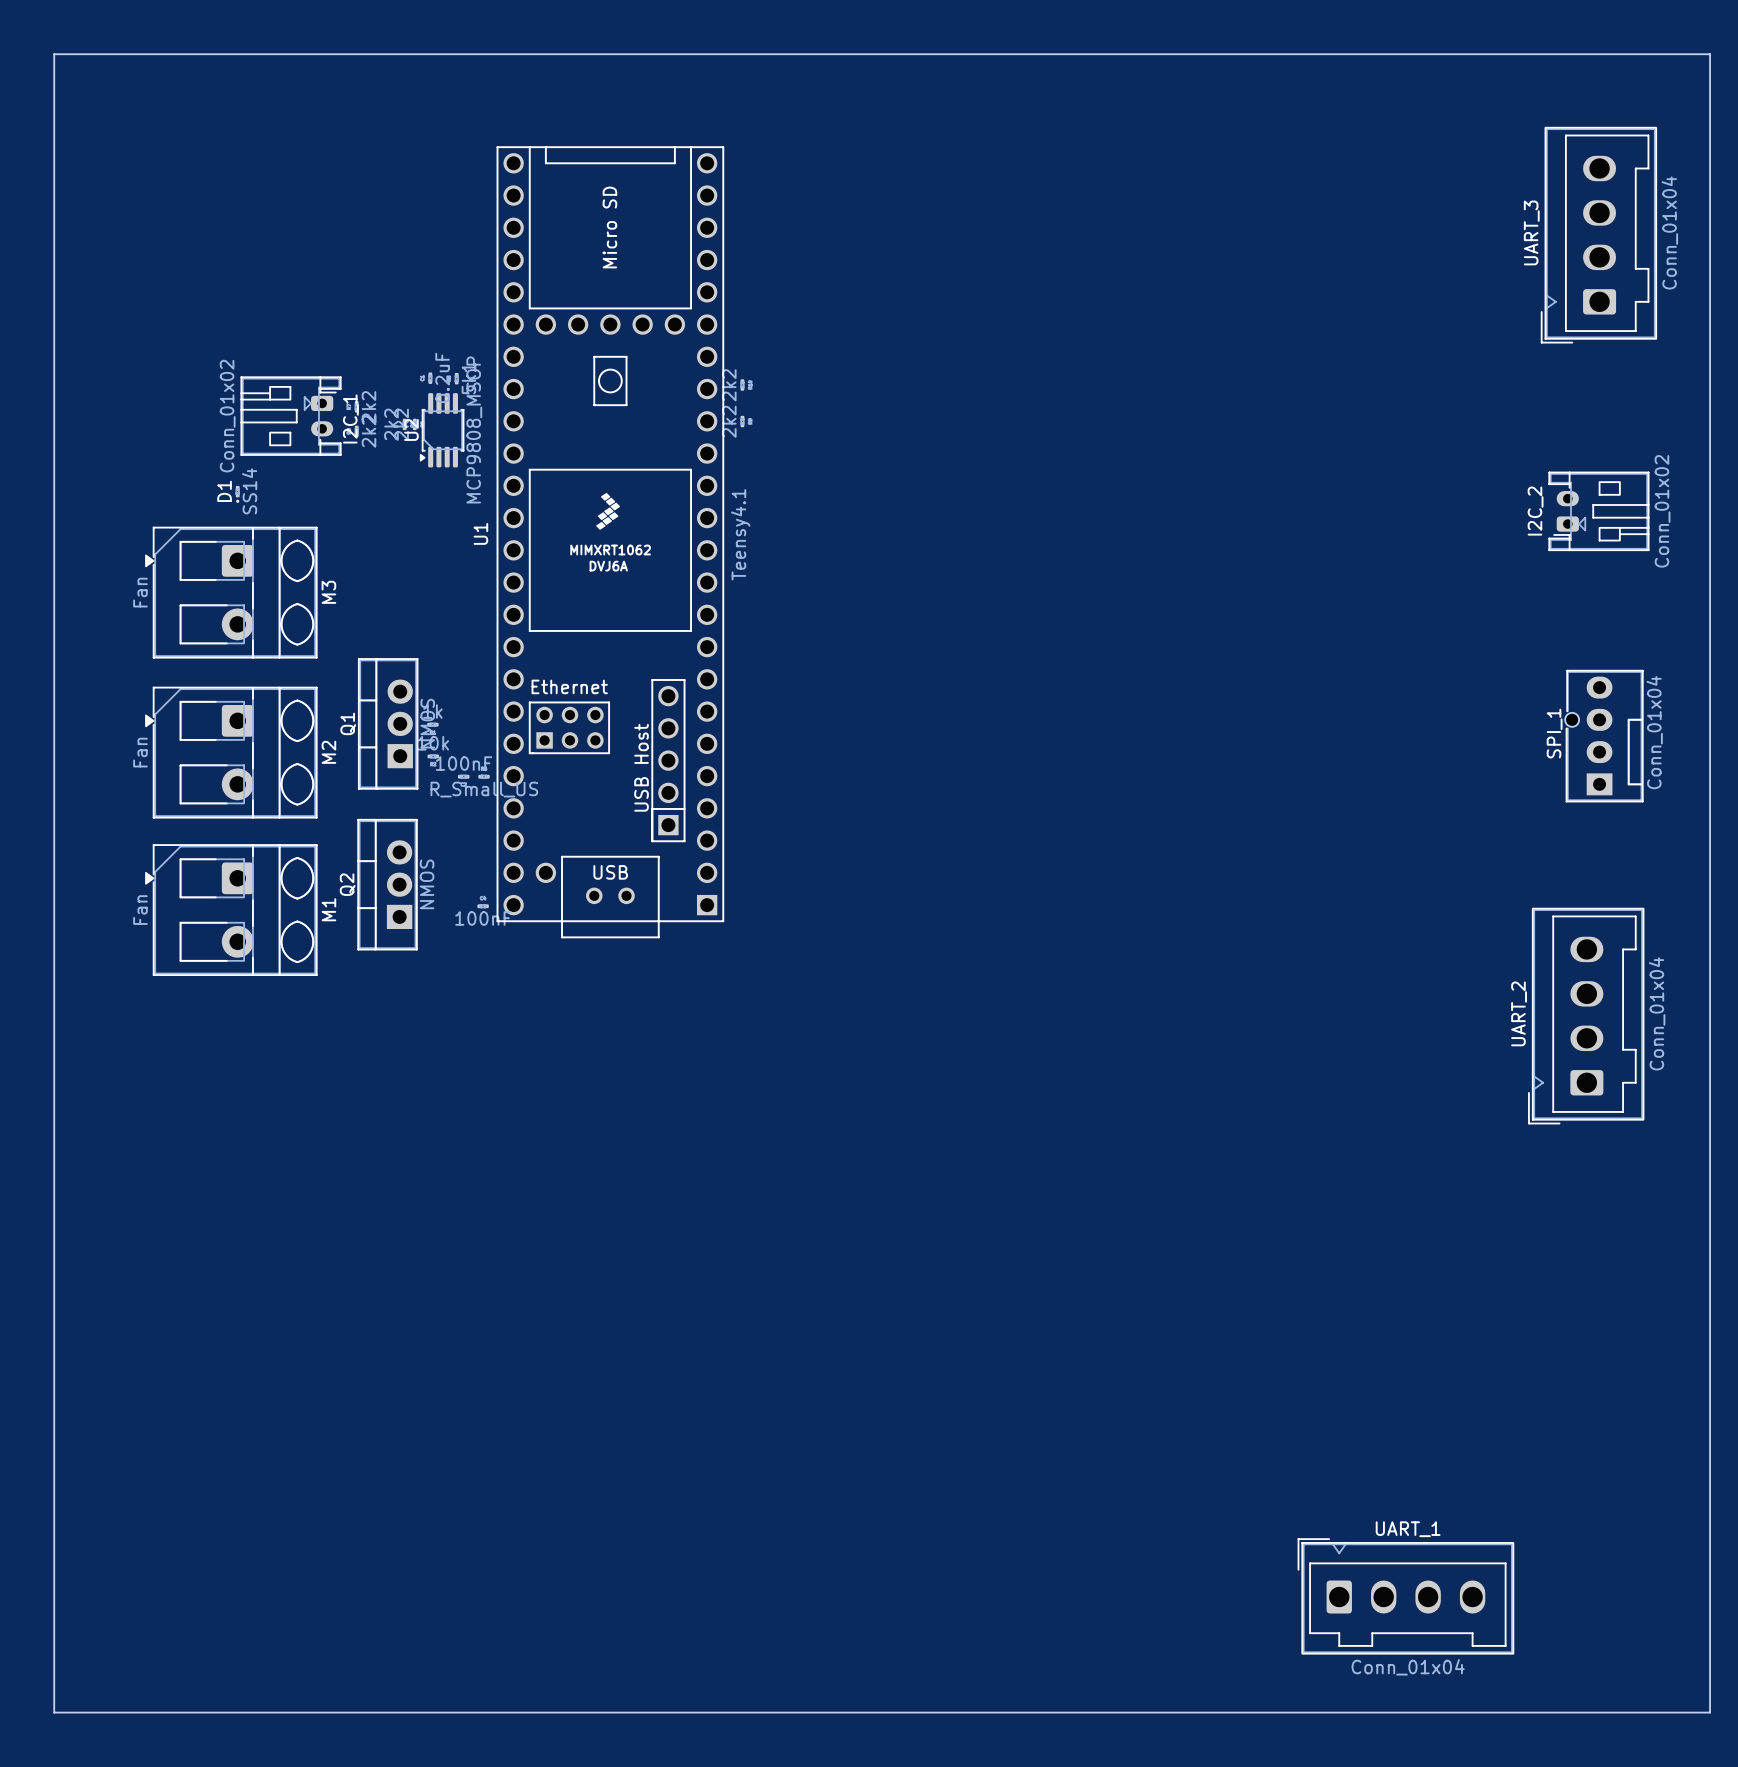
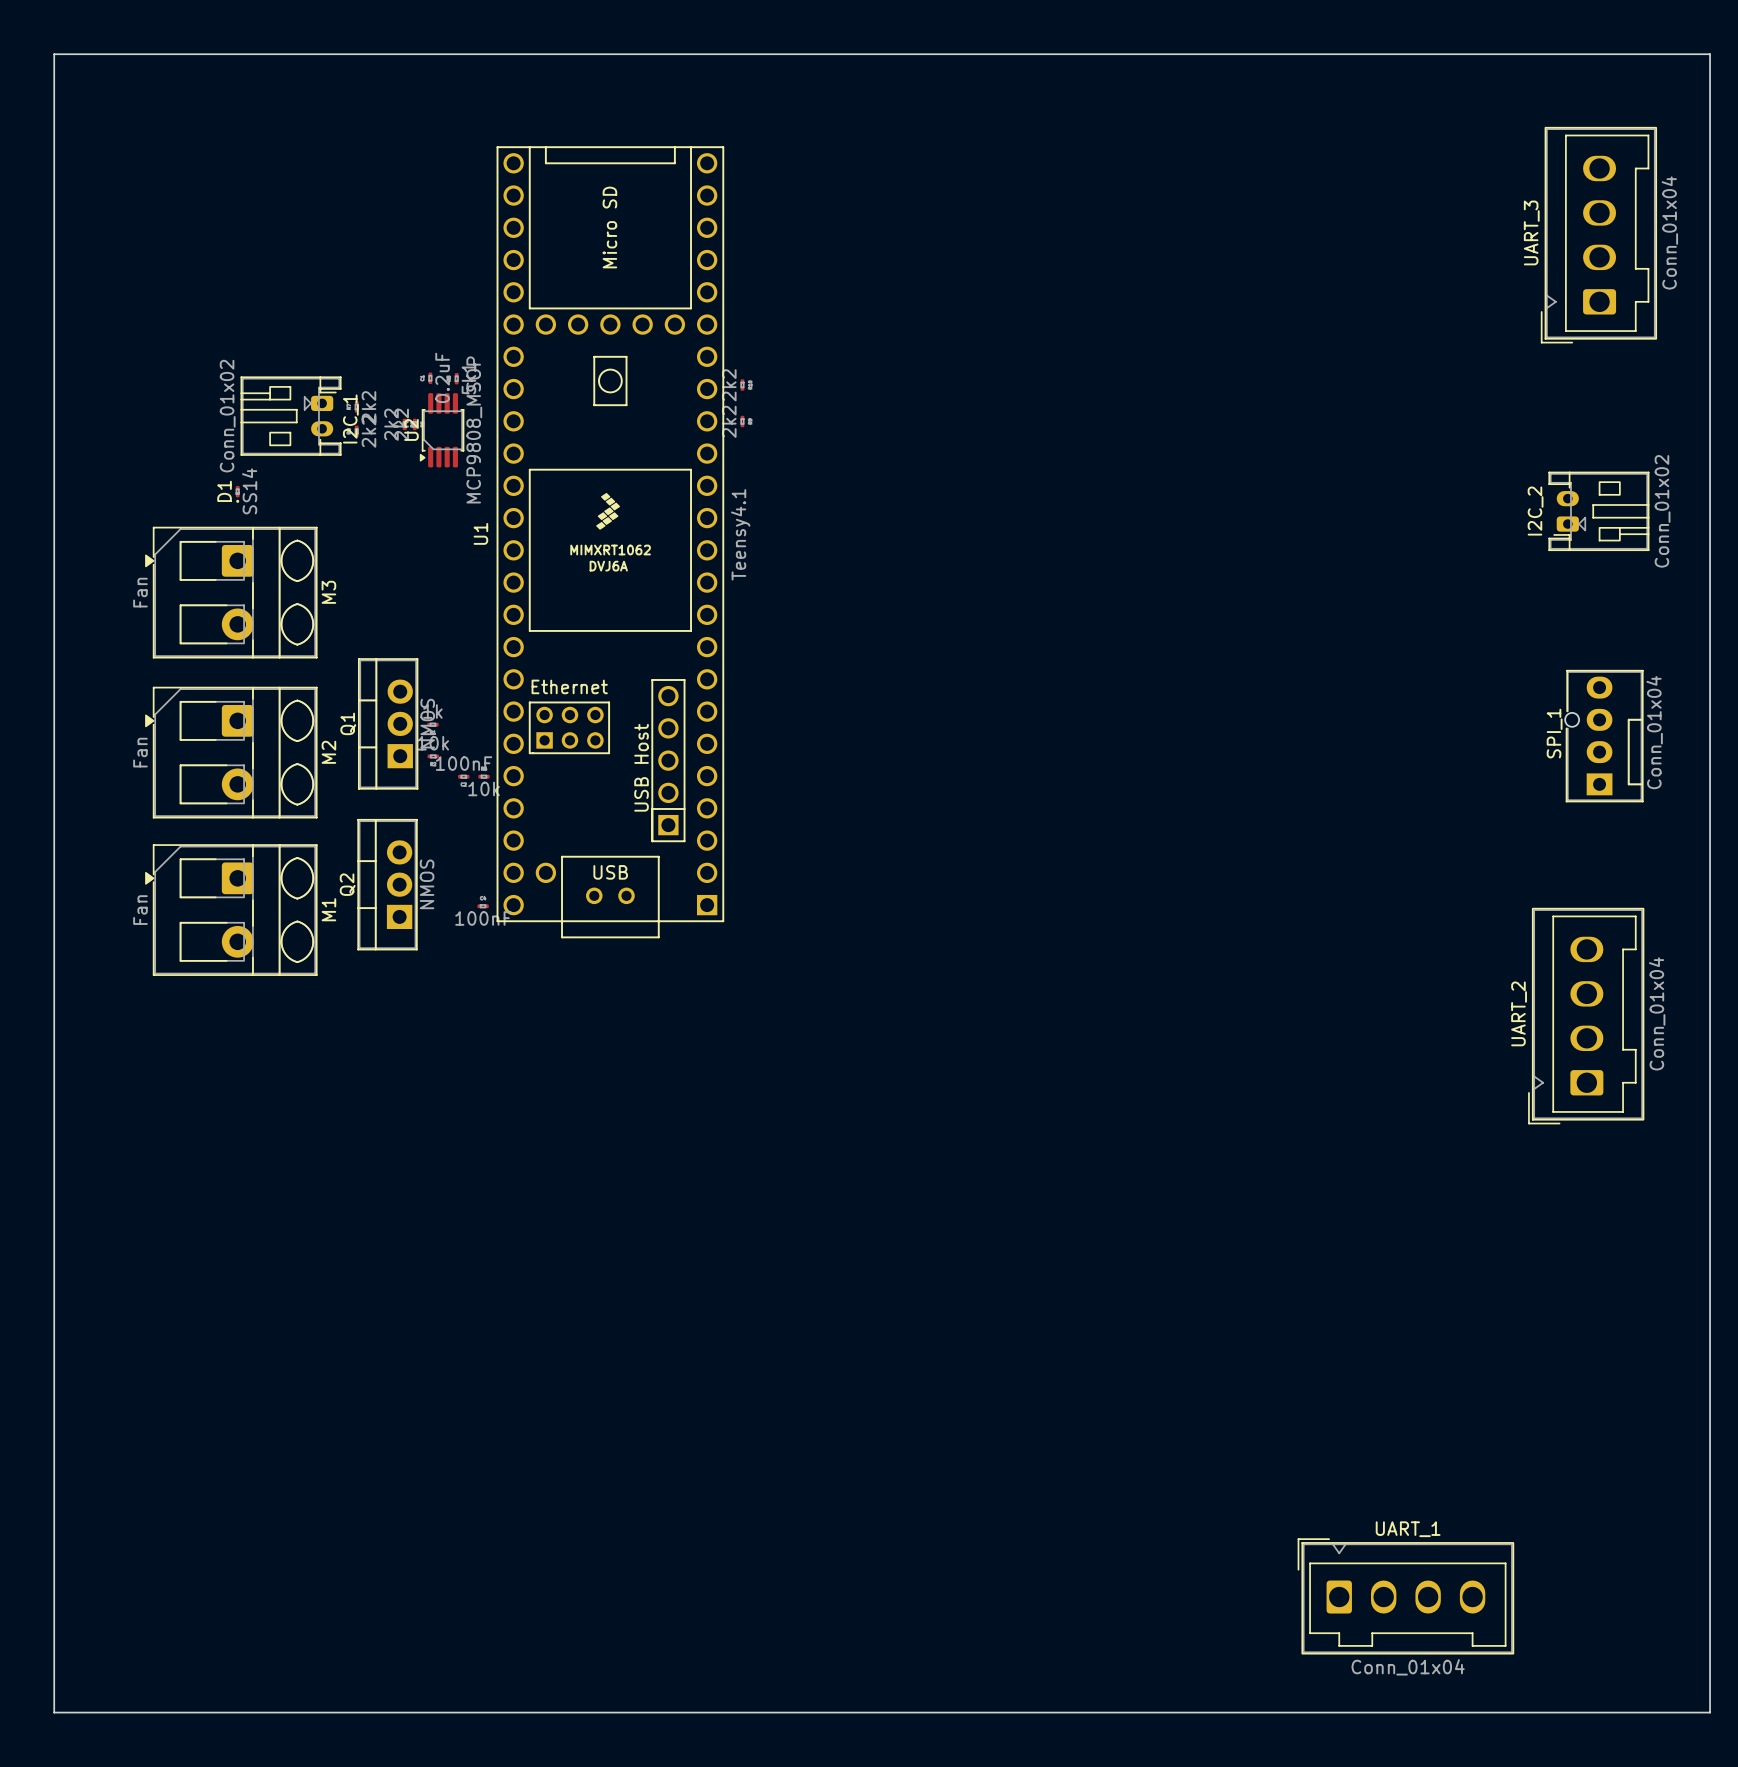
part value: R_Small_US (484, 789) -> 10k (484, 788)

